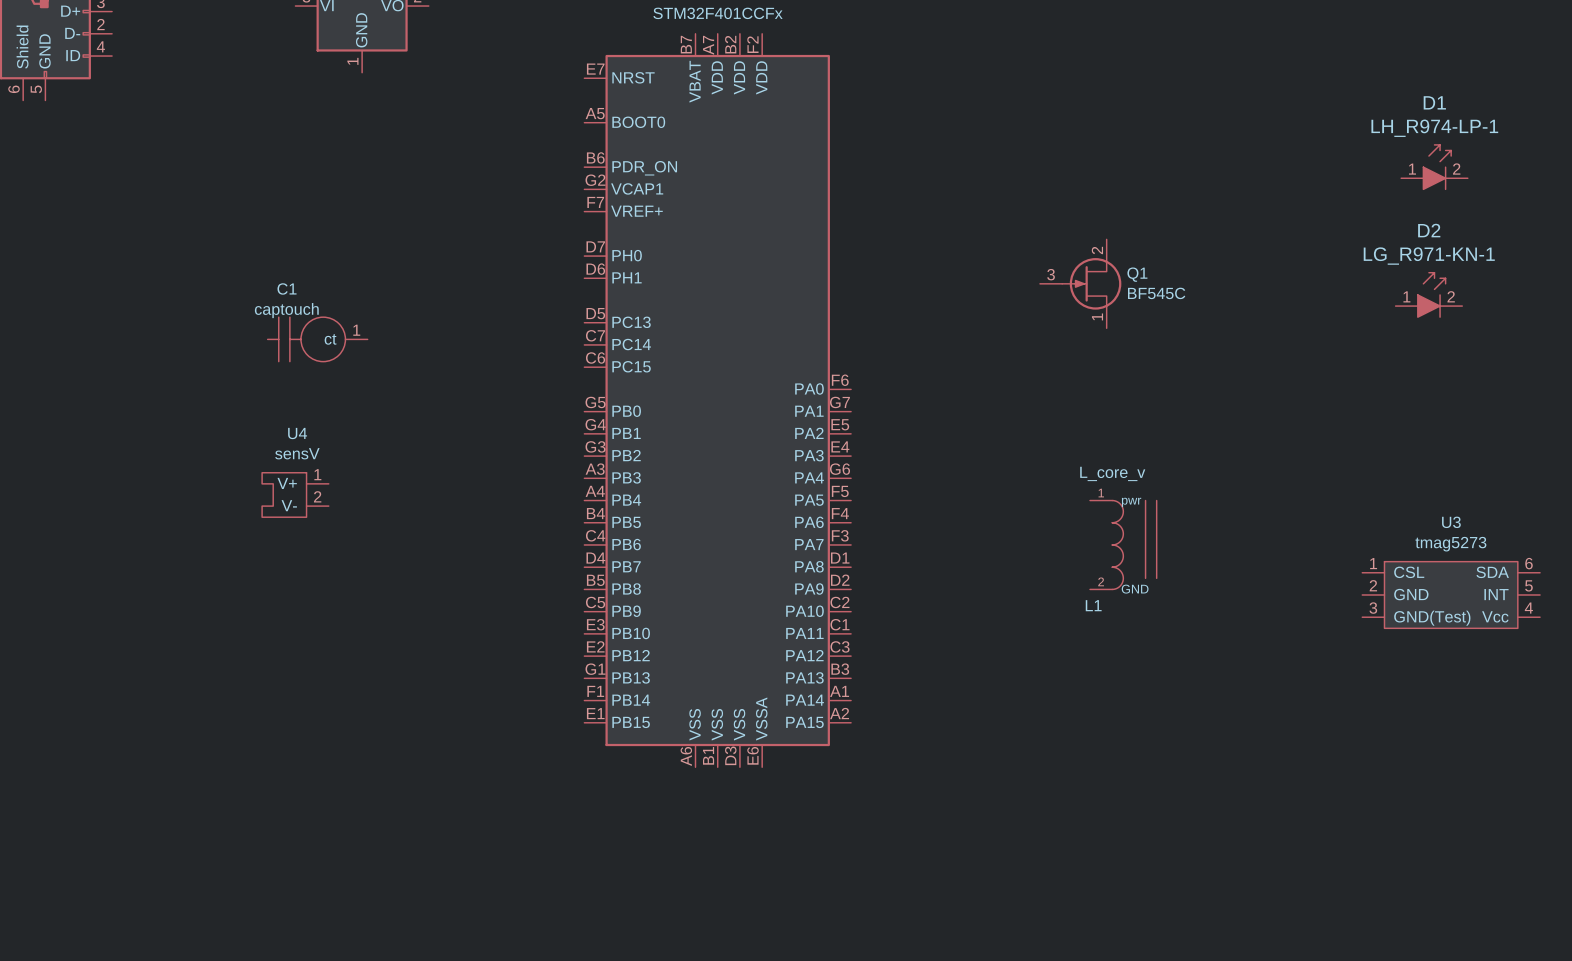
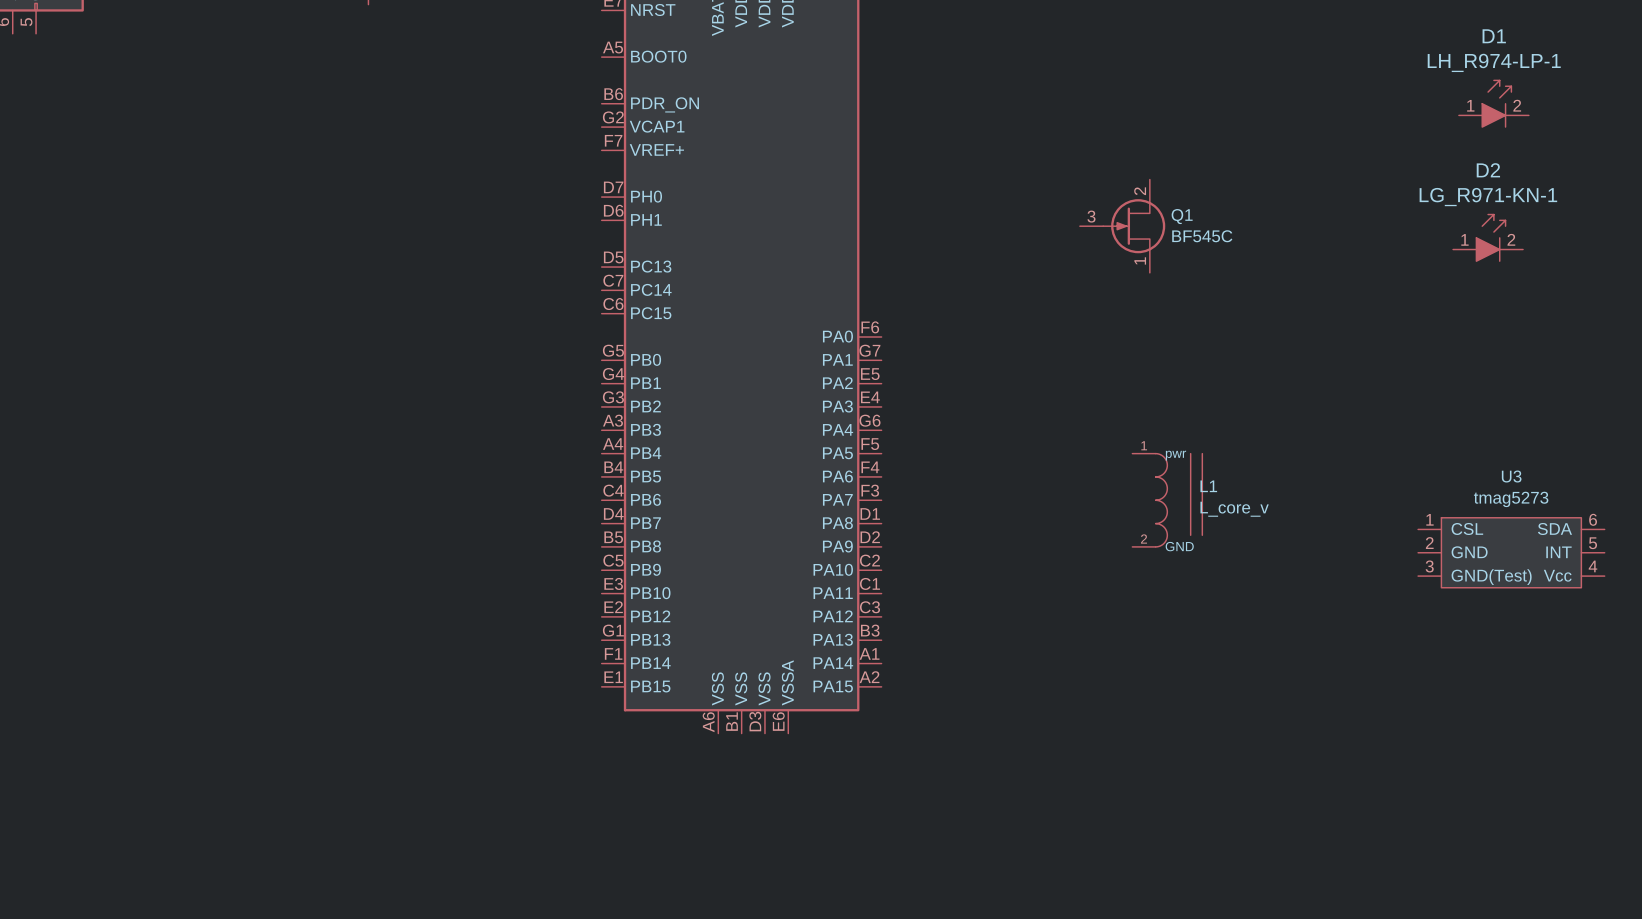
C1: captouch (317, 339) -> none
L1 value position: L_core_v (1112, 473) -> L_core_v (1234, 509)
U4: sensV (295, 494) -> none
L1 name position: L1 (1093, 605) -> L1 (1208, 486)

